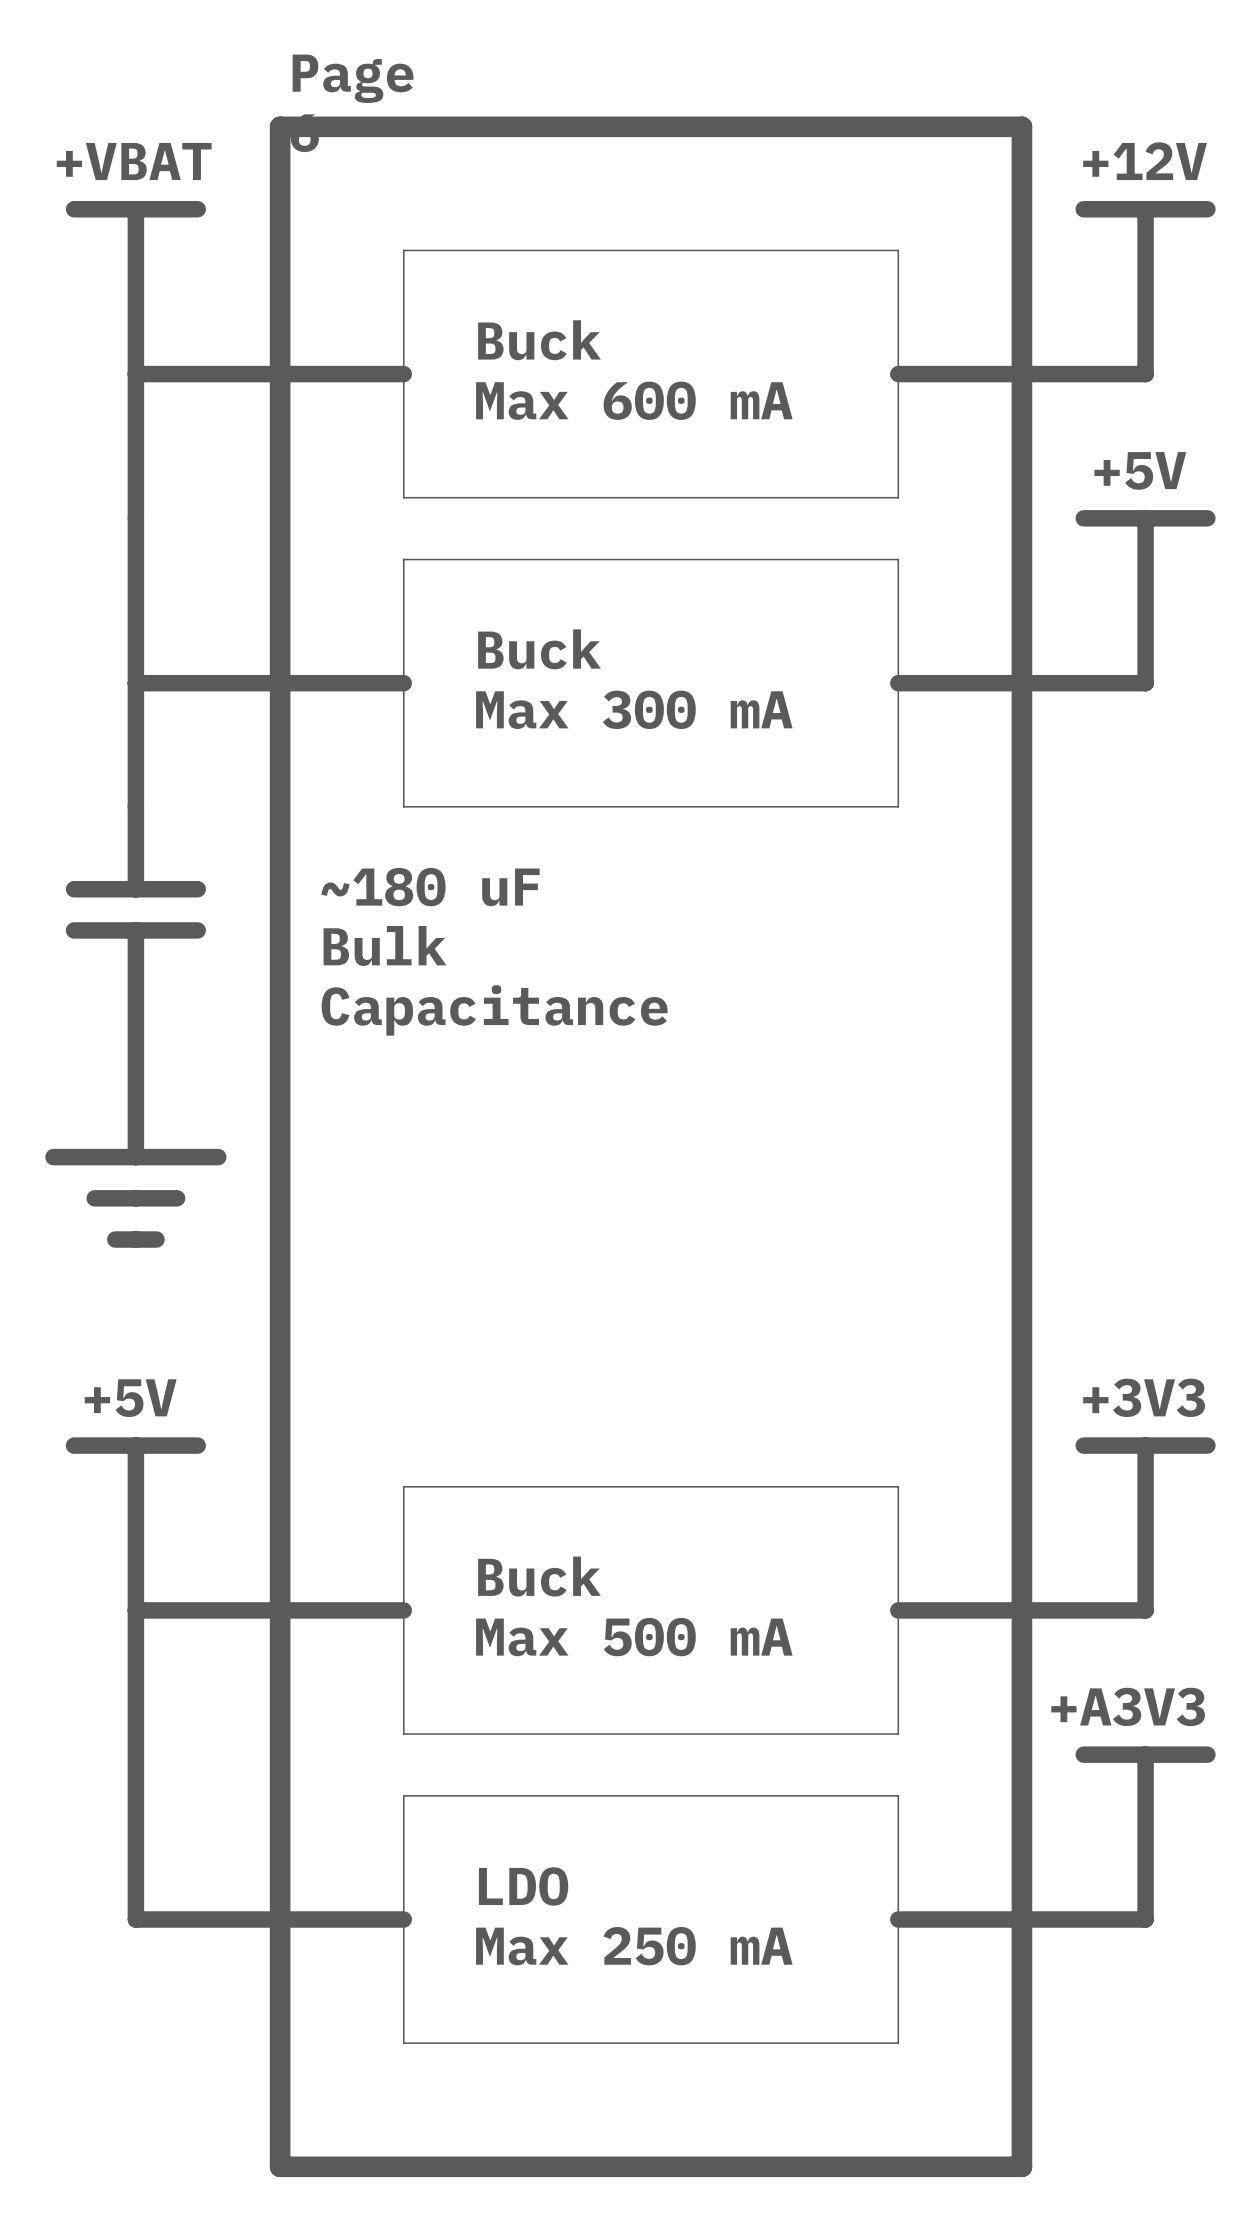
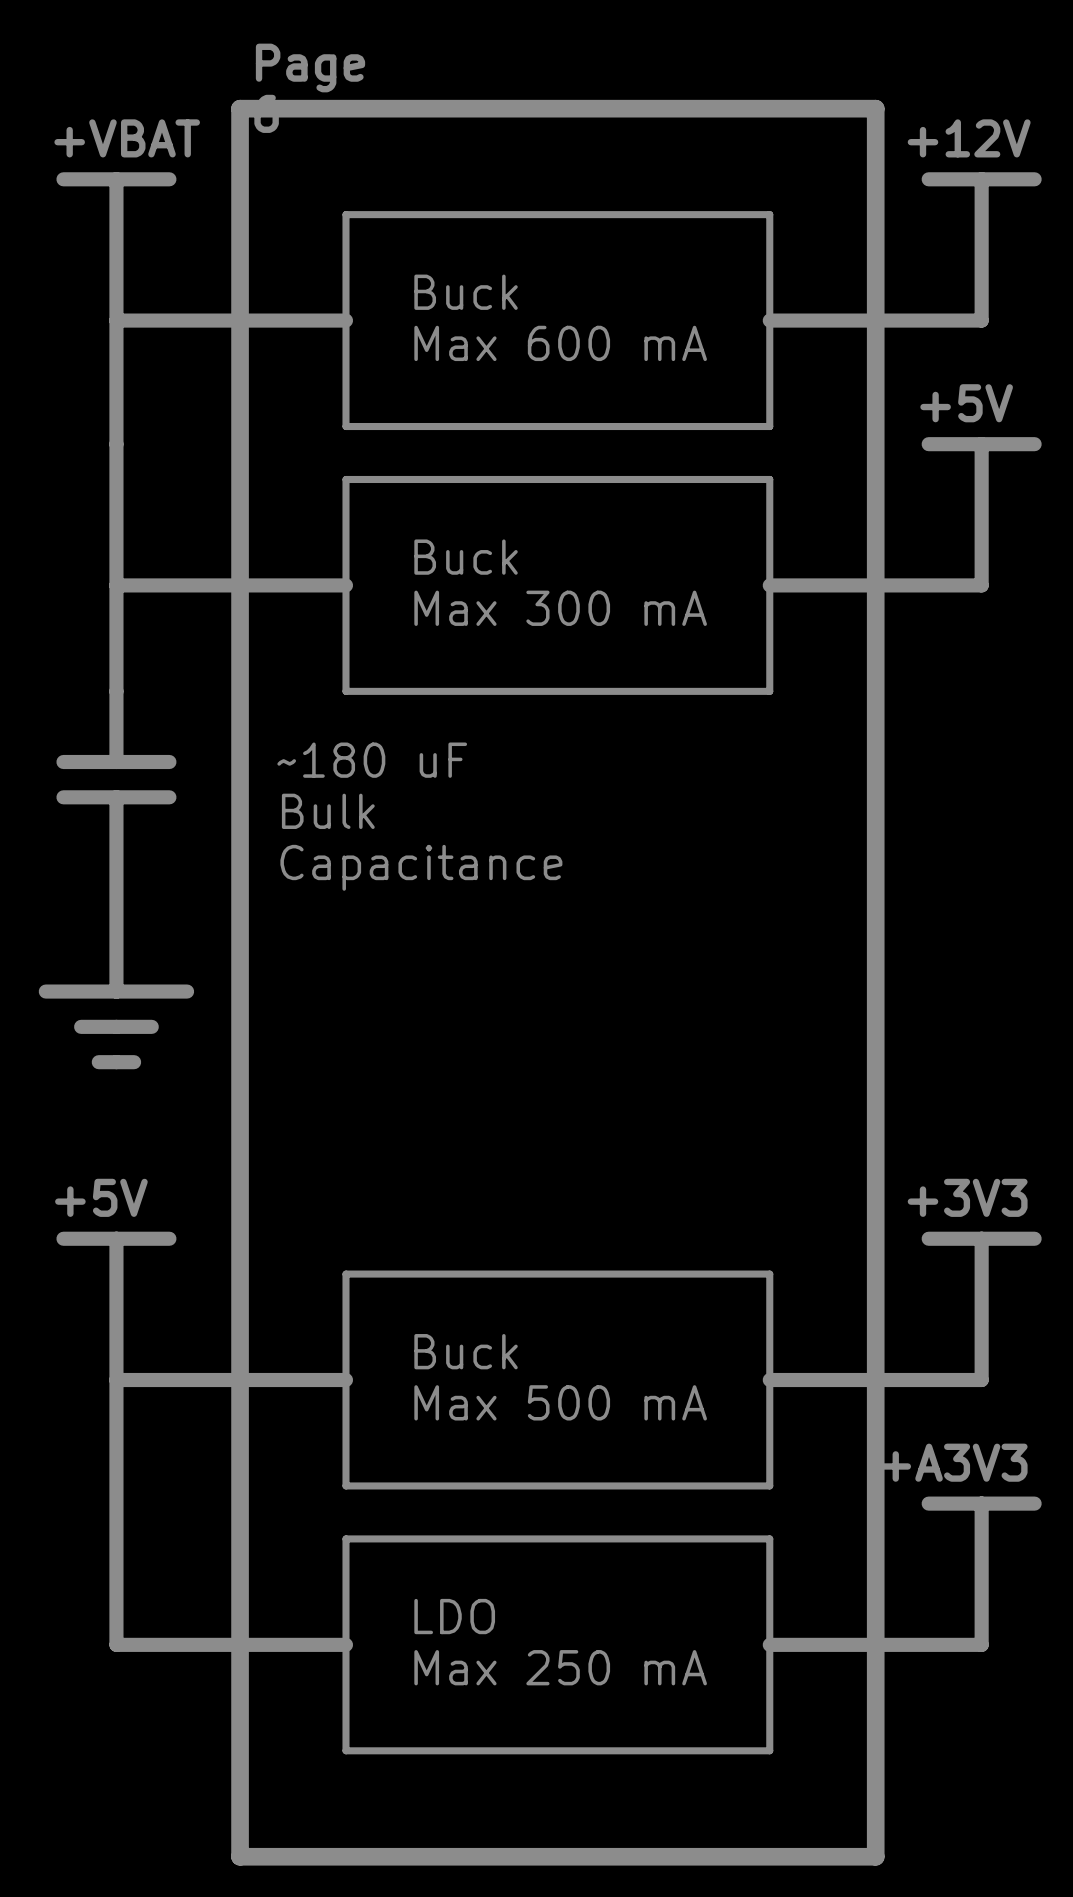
line width: thin (403, 250) (898, 250) (898, 497) (403, 497) (403, 250) -> thick (345, 214) (769, 214) (769, 426) (345, 426) (345, 214)
line width: thin (403, 559) (403, 806) (898, 806) (898, 559) (403, 559) -> thick (345, 479) (345, 691) (769, 691) (769, 479) (345, 479)
line width: thin (403, 1486) (403, 1734) (898, 1734) (898, 1486) (403, 1486) -> thick (345, 1274) (345, 1485) (769, 1485) (769, 1274) (345, 1274)
line width: thin (403, 1795) (403, 2043) (898, 2043) (898, 1795) (403, 1795) -> thick (345, 1538) (345, 1750) (769, 1750) (769, 1538) (345, 1538)

